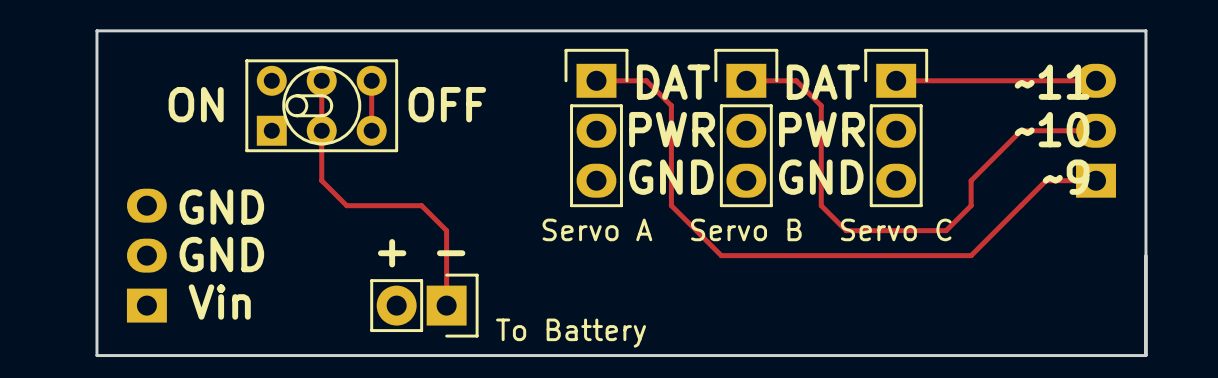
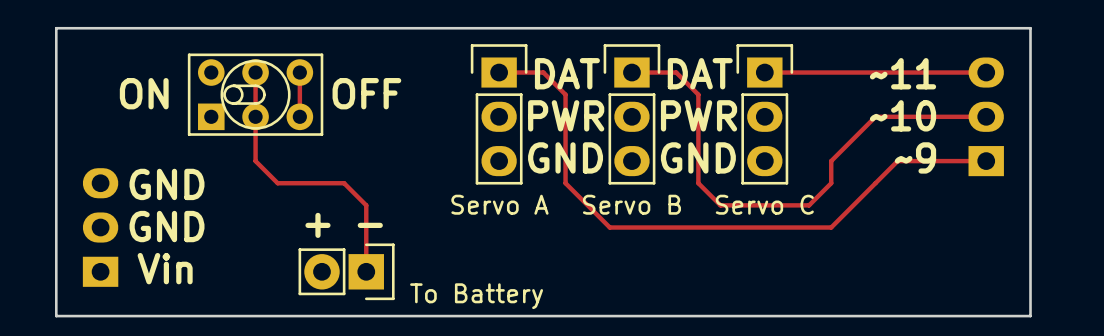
board edge: (1145, 30) (1145, 355) -> (986, 28) (1030, 28) (1030, 316) (986, 316)
track: none -> (941, 72) (986, 72)
track: none -> (941, 116) (986, 116)
part position: (1096, 130) -> (986, 116)
track: none -> (941, 161) (986, 161)

